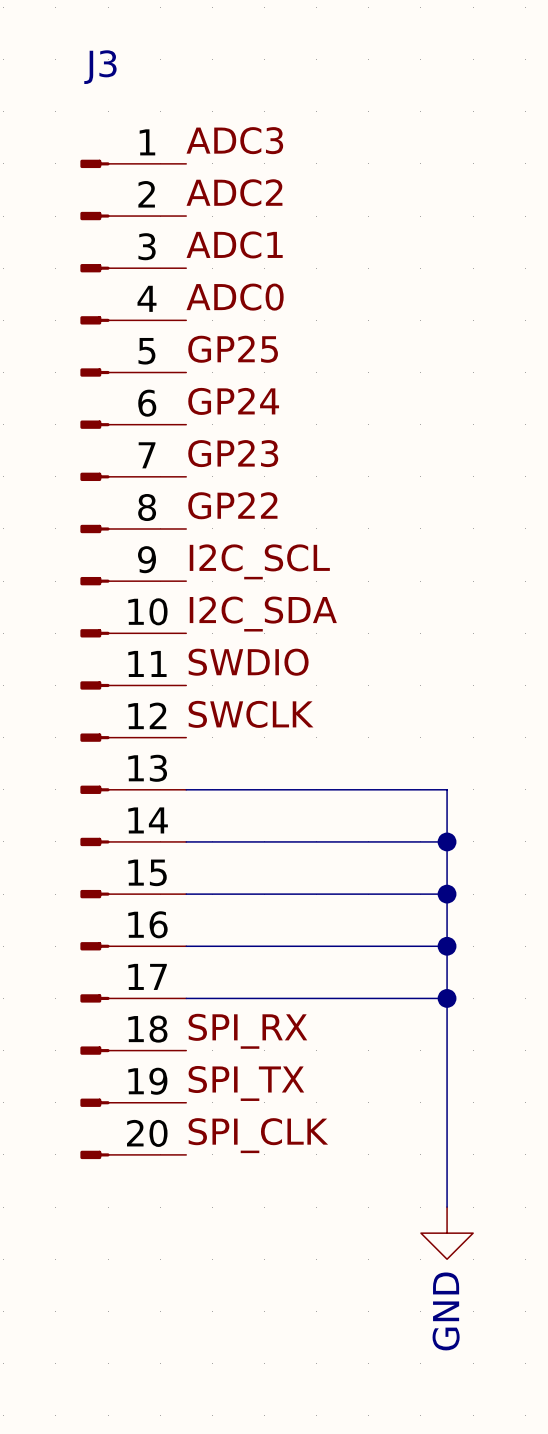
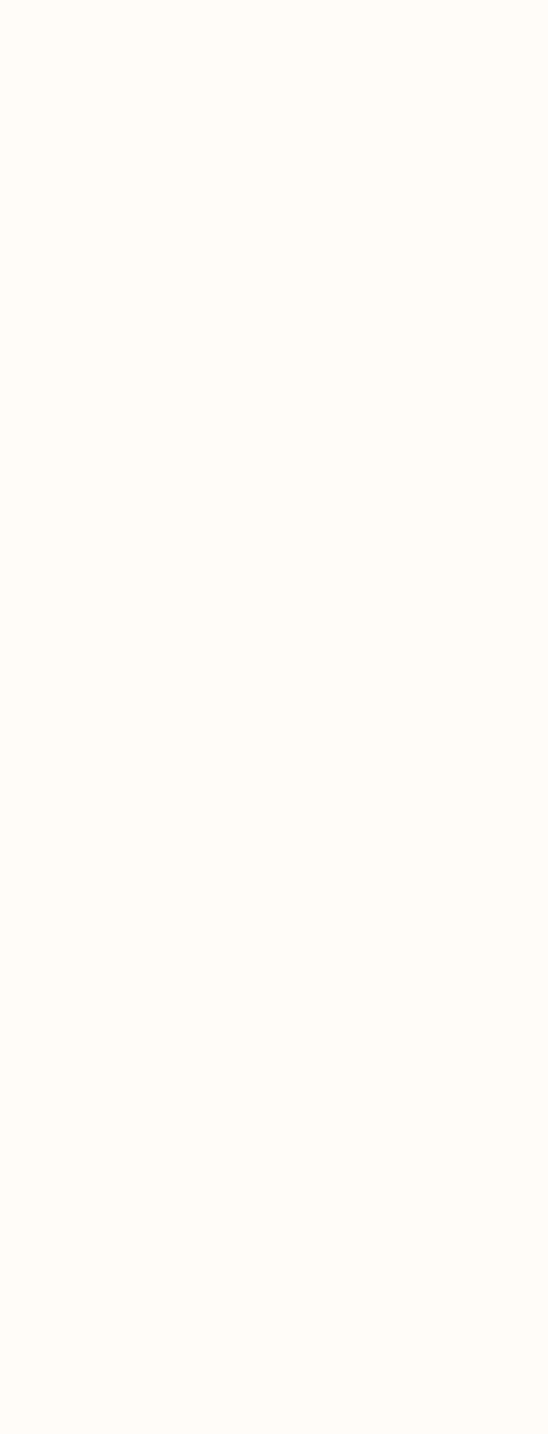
label: ADC3 (234, 140) -> none
label: ADC2 (234, 192) -> none
label: ADC1 (234, 244) -> none
label: ADC0 (235, 297) -> none
label: GP25 (233, 349) -> none
label: GP24 (233, 401) -> none
label: GP23 (233, 453) -> none
label: GP22 (232, 505) -> none
label: I2C_SCL (259, 561) -> none
label: I2C_SDA (263, 614) -> none
J3: (133, 659) -> none
label: SWDIO (248, 662) -> none
label: SWCLK (251, 714) -> none
wire: (186, 789) (447, 789) (447, 1207) -> none
wire: (186, 841) (447, 841) -> none
junction: (447, 841) -> none
wire: (186, 894) (447, 894) -> none
junction: (447, 894) -> none
wire: (186, 946) (447, 946) -> none
junction: (447, 946) -> none
wire: (186, 998) (447, 998) -> none
junction: (447, 998) -> none
label: SPI_RX (247, 1031) -> none
label: SPI_TX (246, 1083) -> none
label: SPI_CLK (258, 1135) -> none
power symbol: GND (447, 1233) -> none

